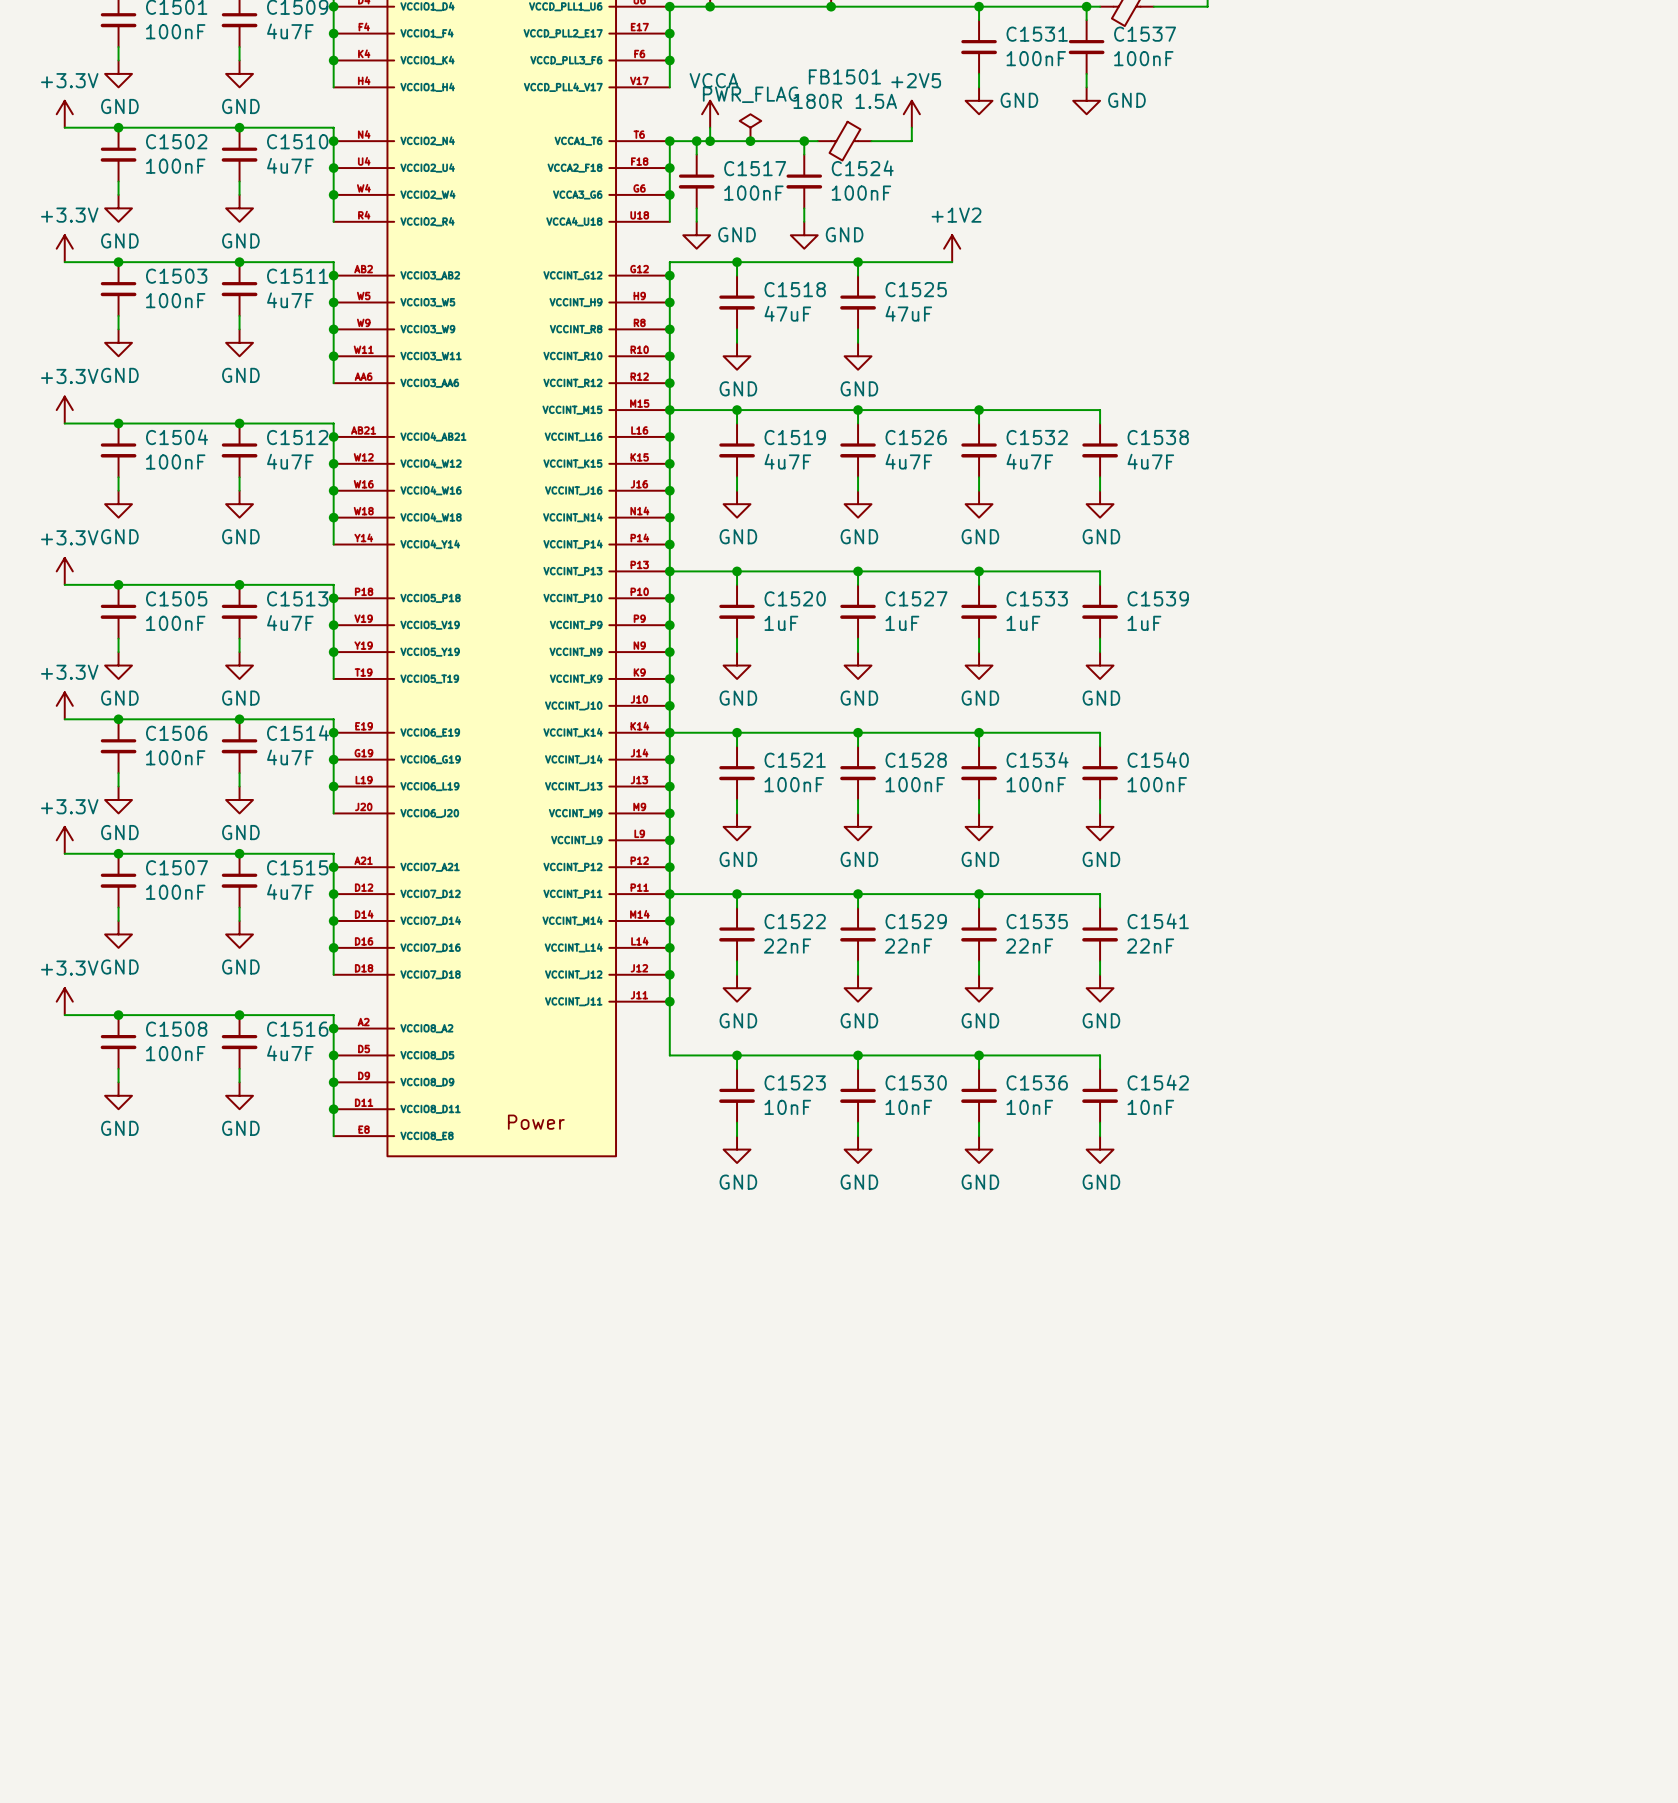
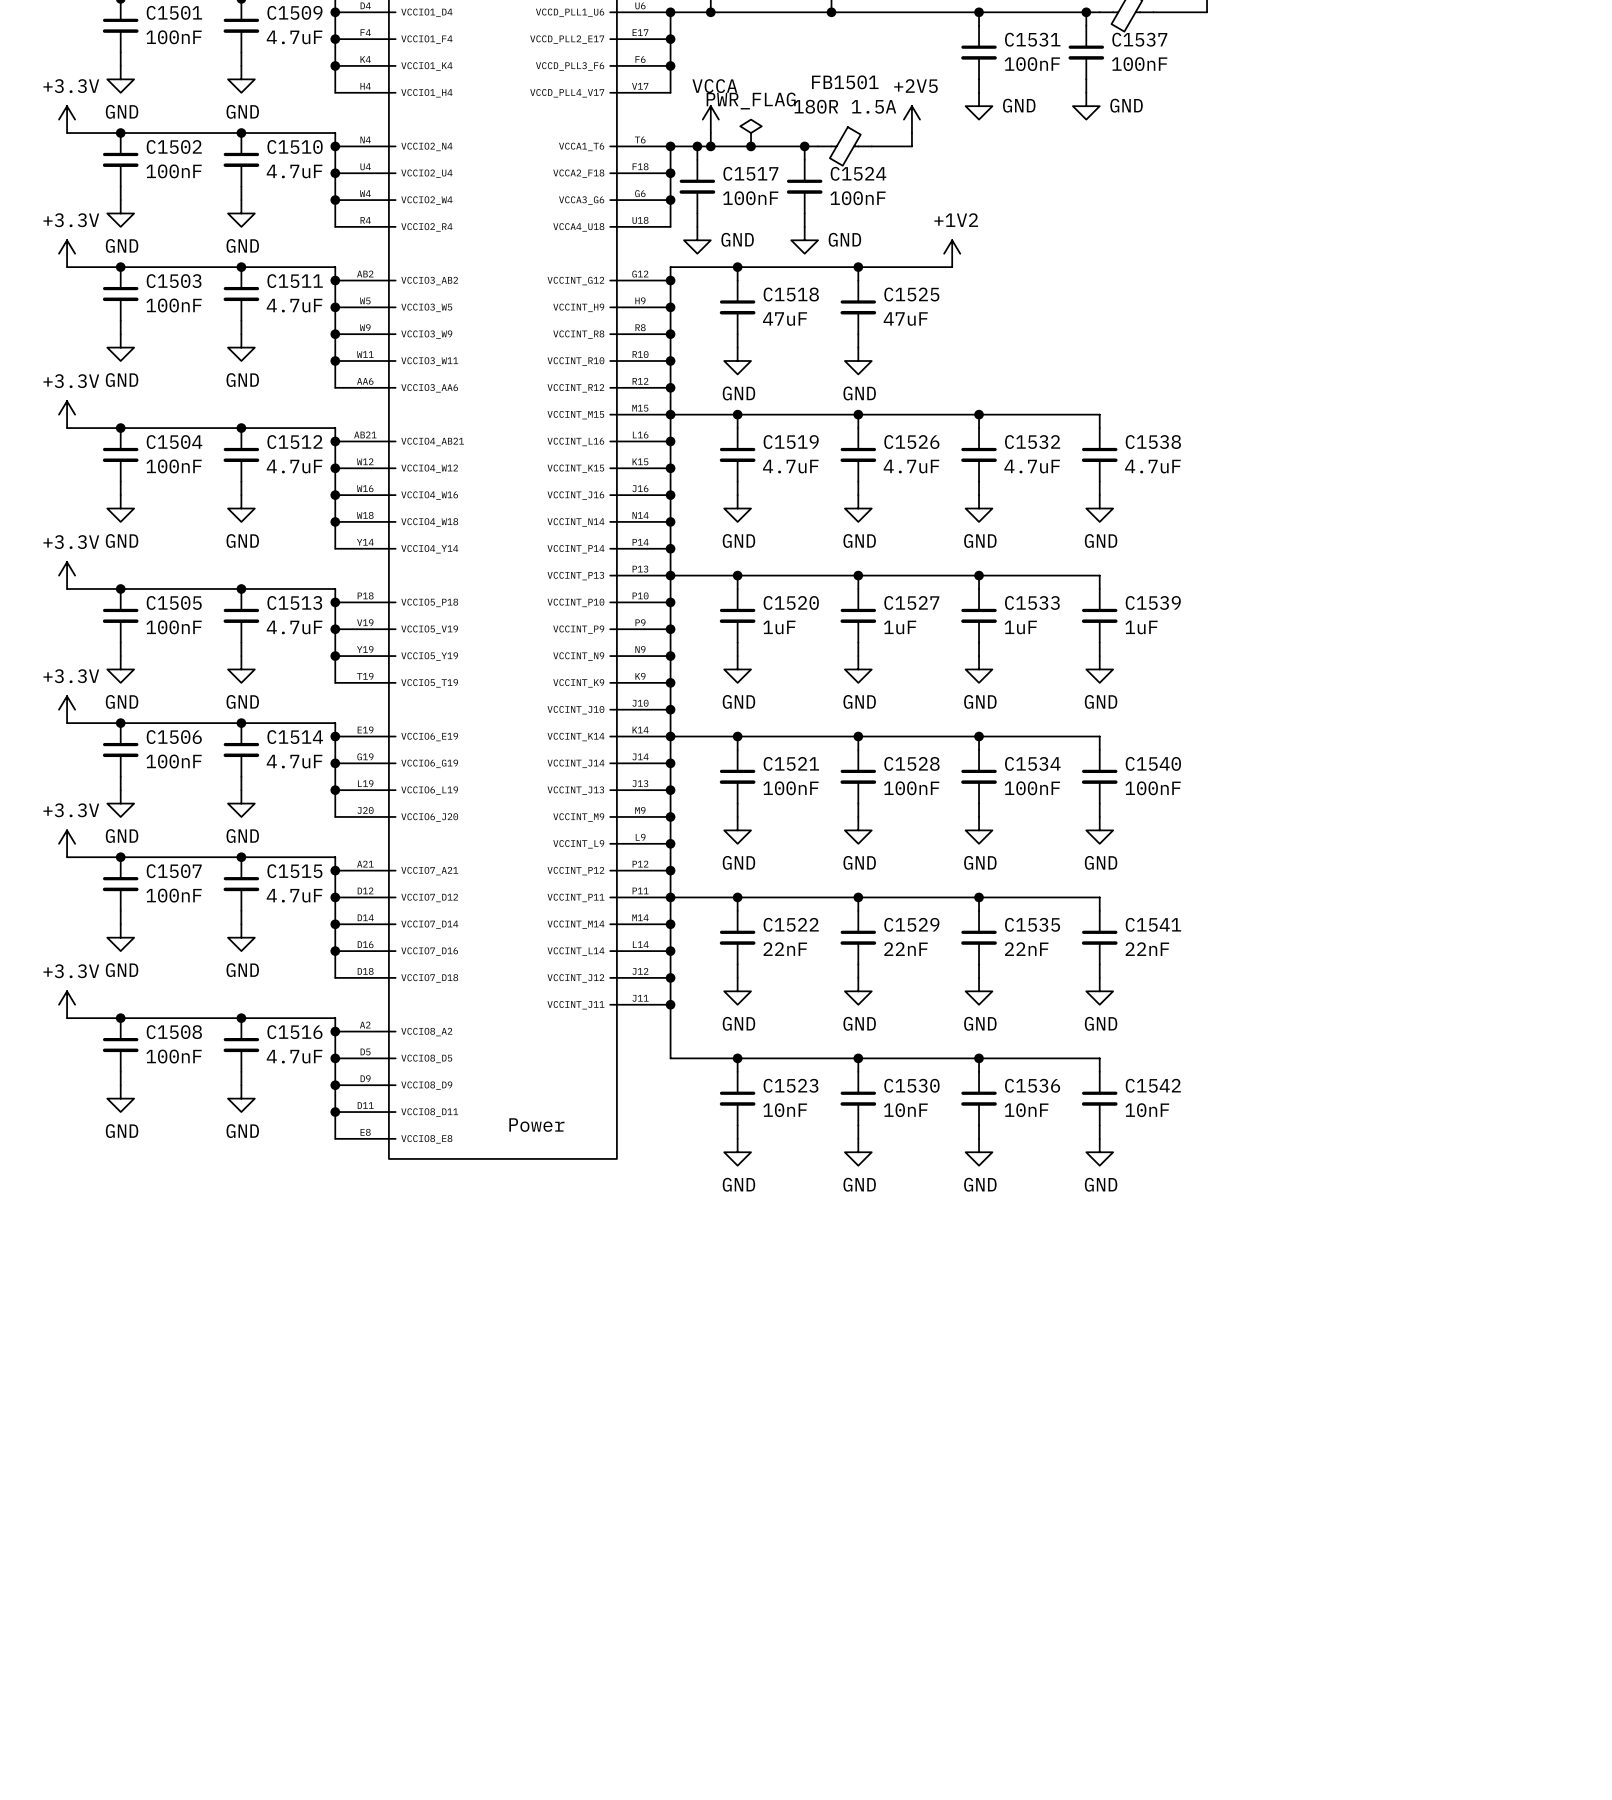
C1509 value: 4u7F (290, 31) -> 4.7uF (294, 37)
C1510 value: 4u7F (290, 165) -> 4.7uF (294, 171)
C1511 value: 4u7F (290, 300) -> 4.7uF (294, 305)
C1512 value: 4u7F (290, 461) -> 4.7uF (294, 466)
C1519 value: 4u7F (787, 461) -> 4.7uF (790, 466)
C1526 value: 4u7F (908, 461) -> 4.7uF (911, 466)
C1532 value: 4u7F (1029, 461) -> 4.7uF (1032, 466)
C1538 value: 4u7F (1150, 461) -> 4.7uF (1152, 466)
C1513 value: 4u7F (290, 623) -> 4.7uF (294, 627)
C1514 value: 4u7F (290, 757) -> 4.7uF (294, 761)
C1515 value: 4u7F (290, 891) -> 4.7uF (294, 895)
C1516 value: 4u7F (290, 1053) -> 4.7uF (294, 1056)

